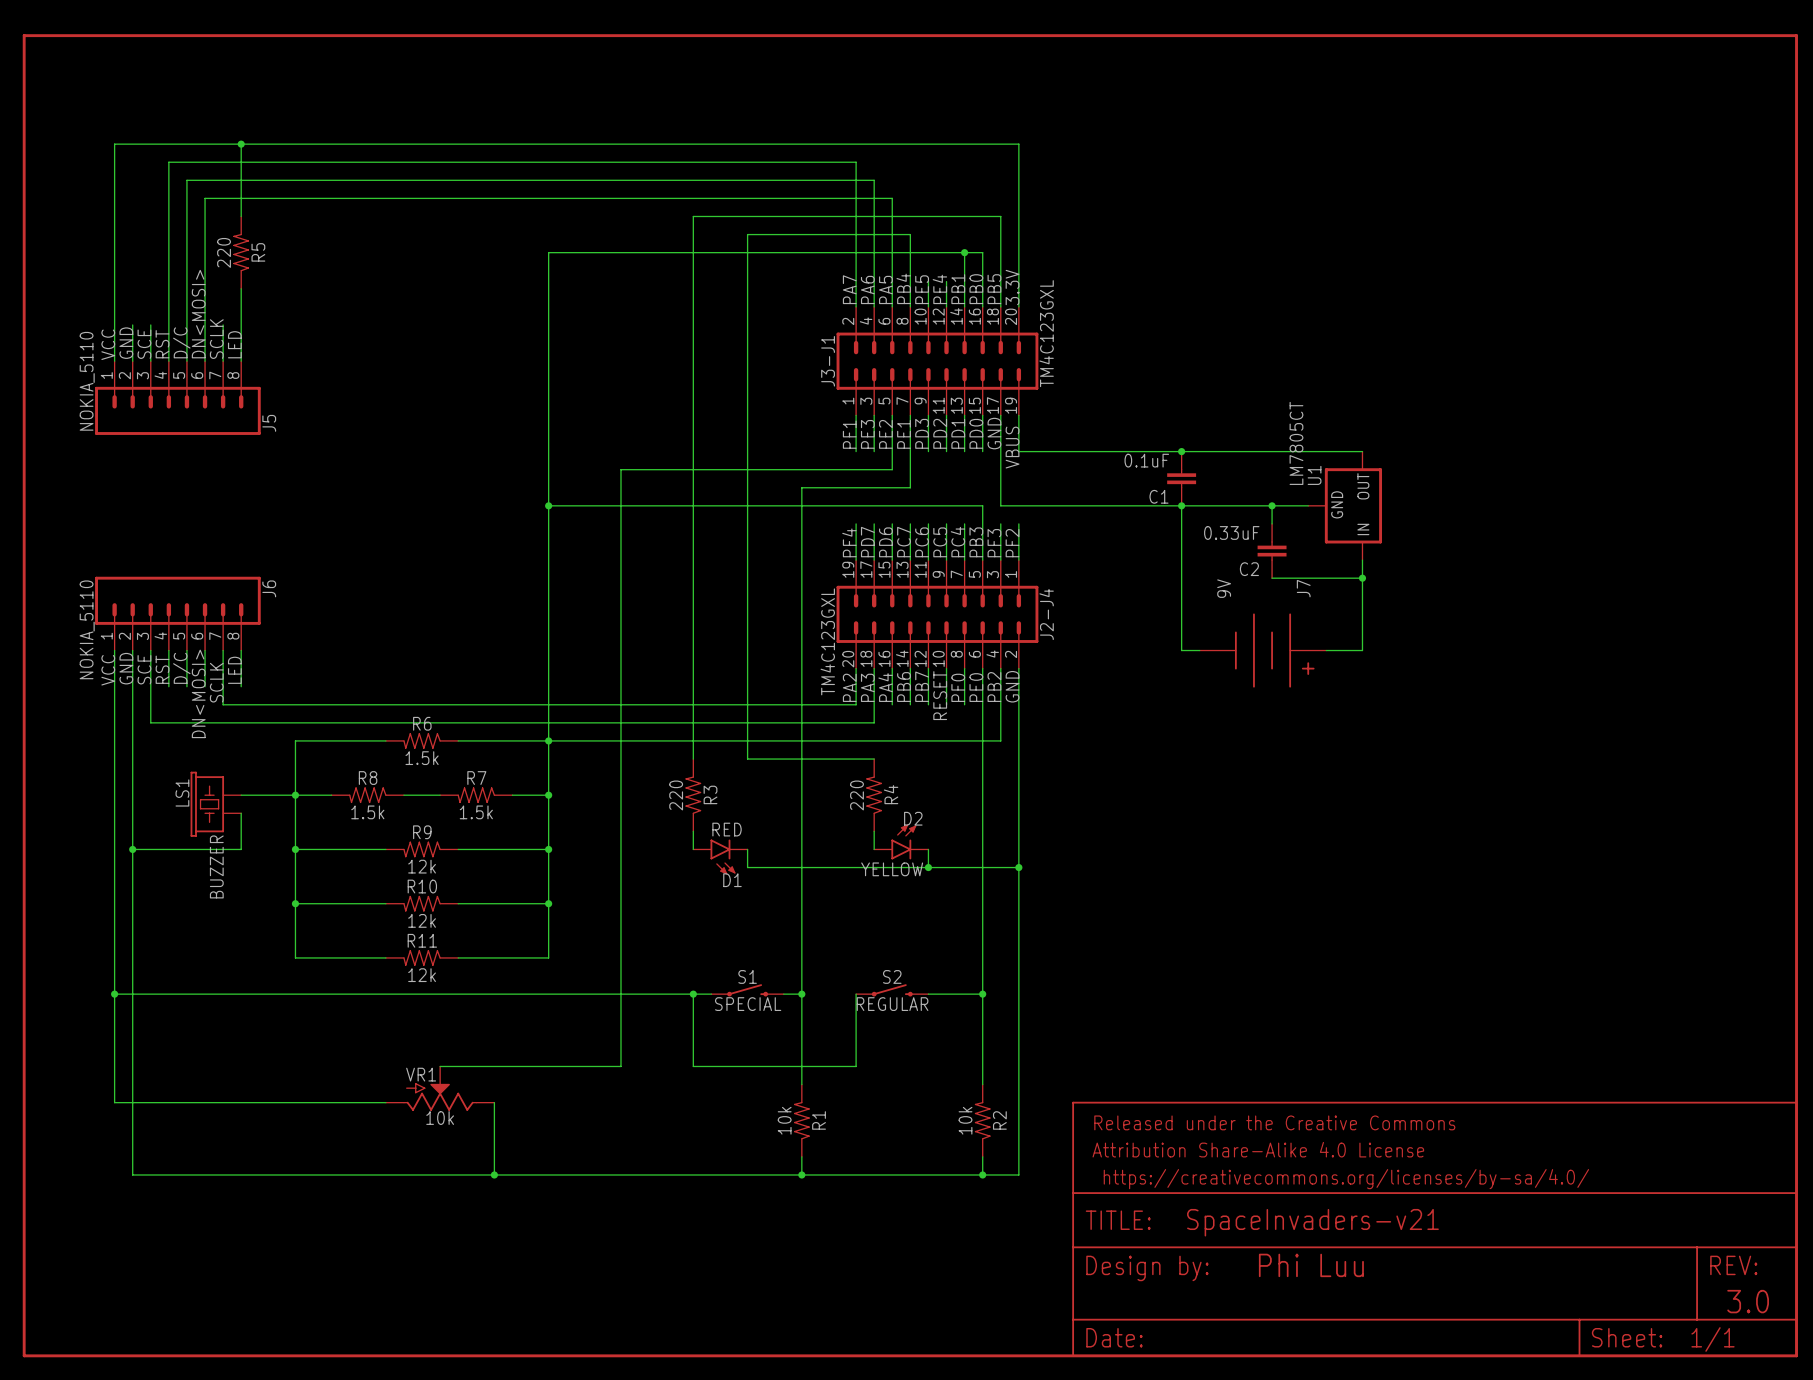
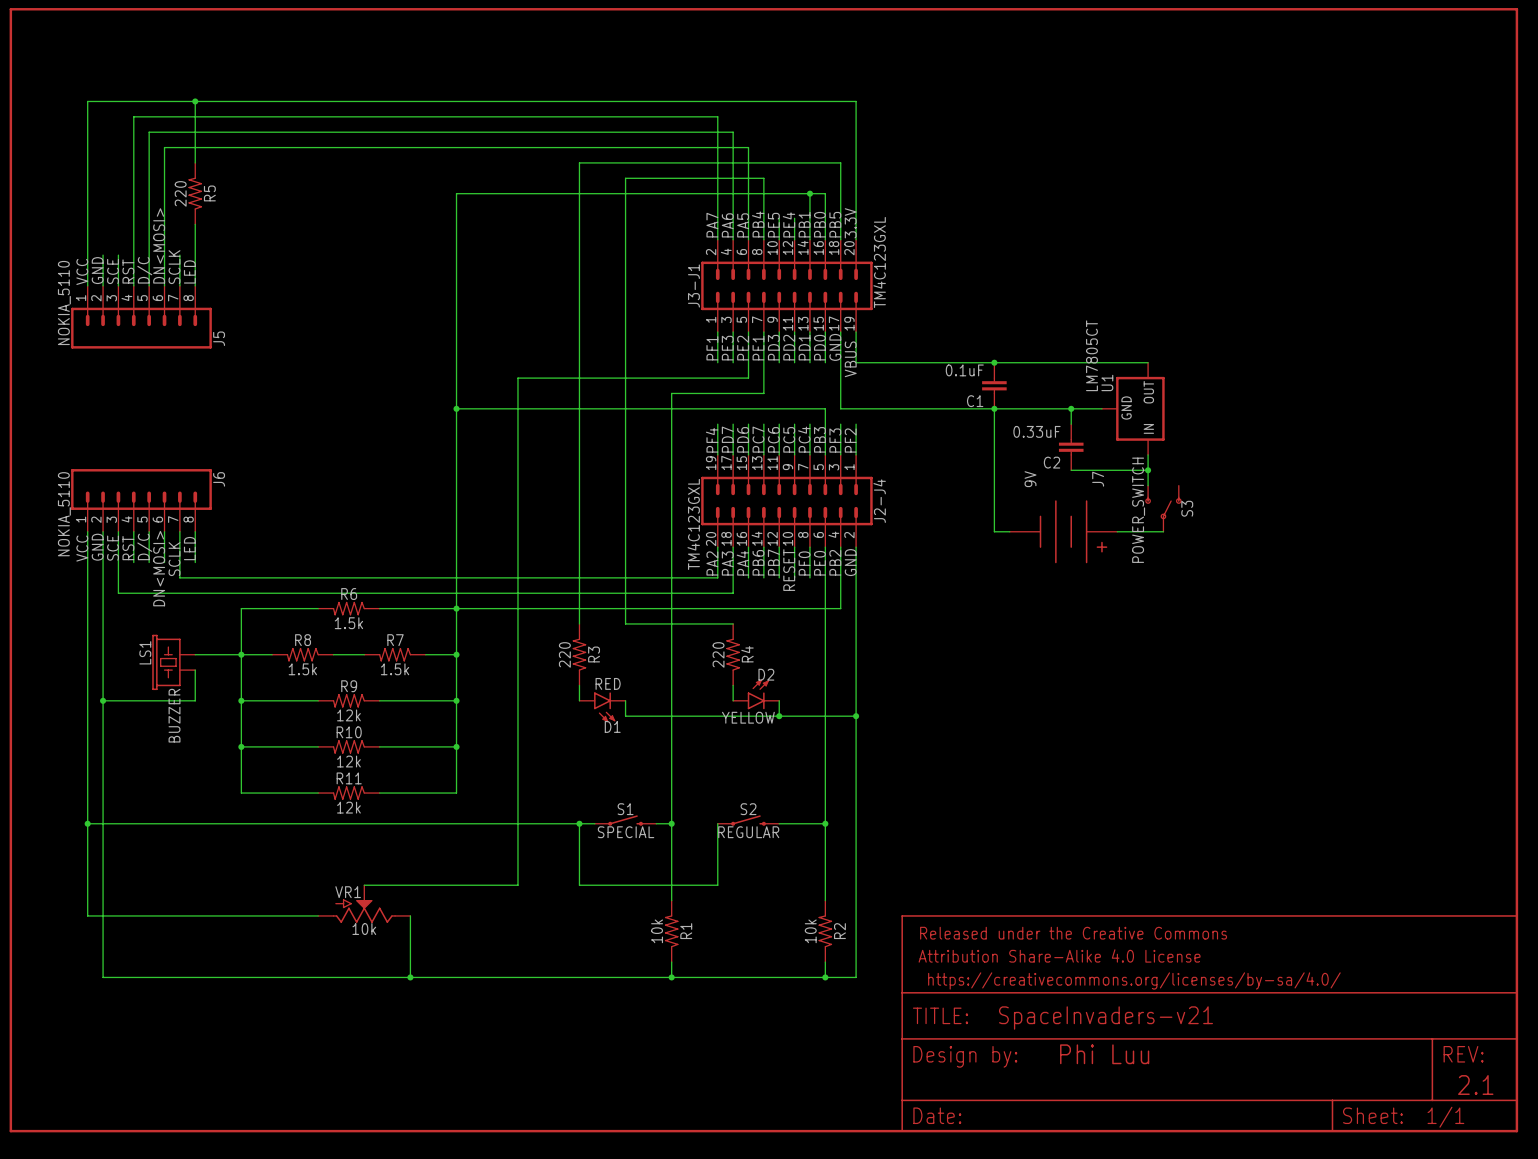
wire: (1362, 596) (1362, 650) -> (1163, 531) (1148, 531)
S3: none -> POWER_SWITCH (1163, 508)
text: 3.0 (1748, 1301) -> 2.1 (1475, 1085)

